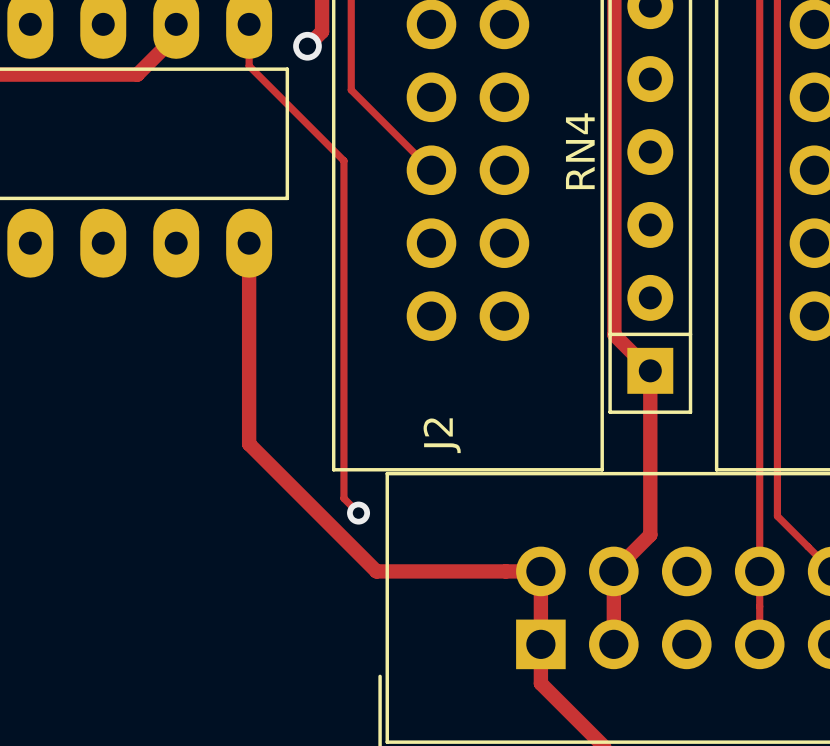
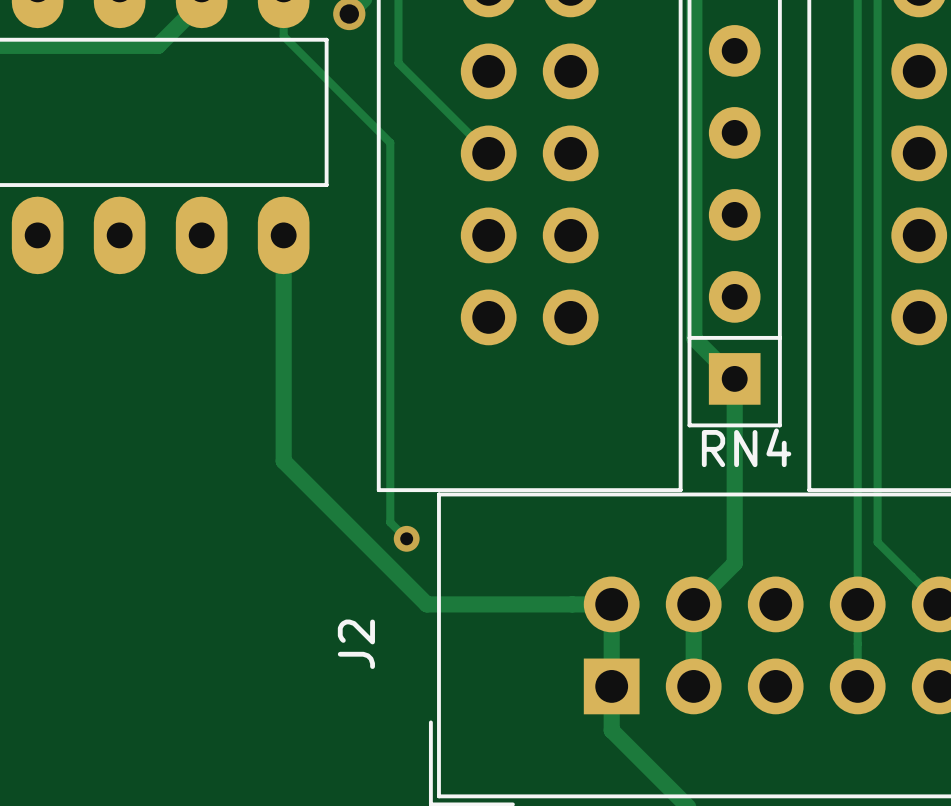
RN4 name rotation: 0° (580, 151) -> 90° clockwise (746, 447)
RN4 name position: RN4 (580, 151) -> RN4 (746, 447)
J2 name position: J2 (442, 435) -> J2 (356, 644)

